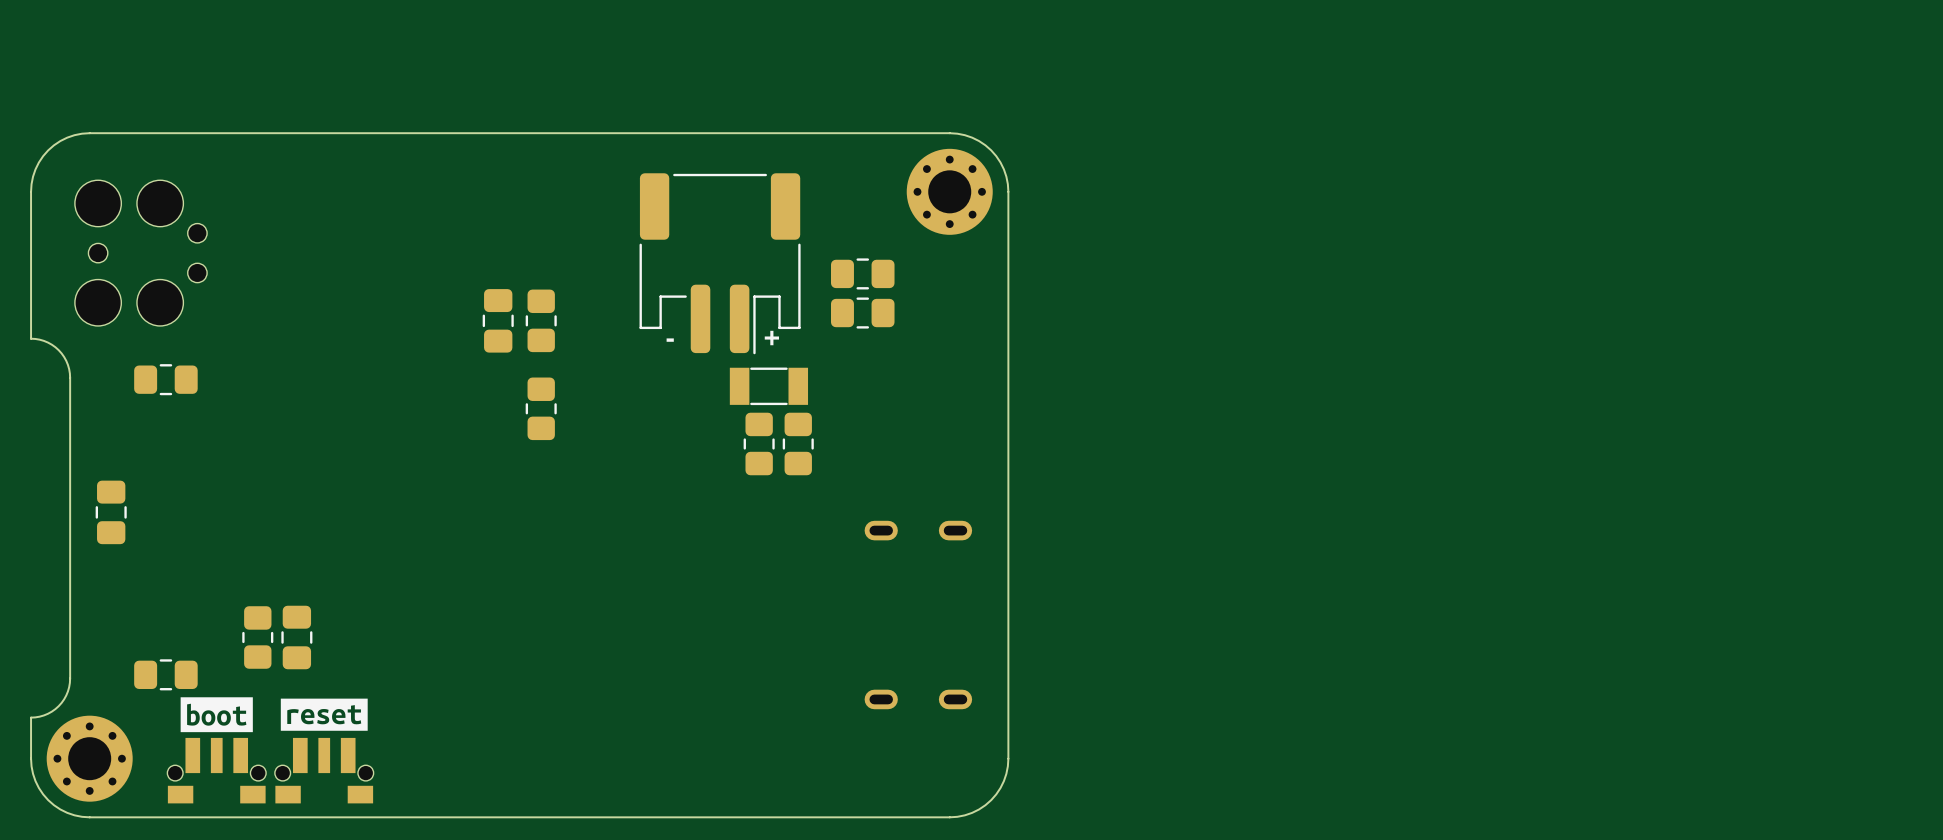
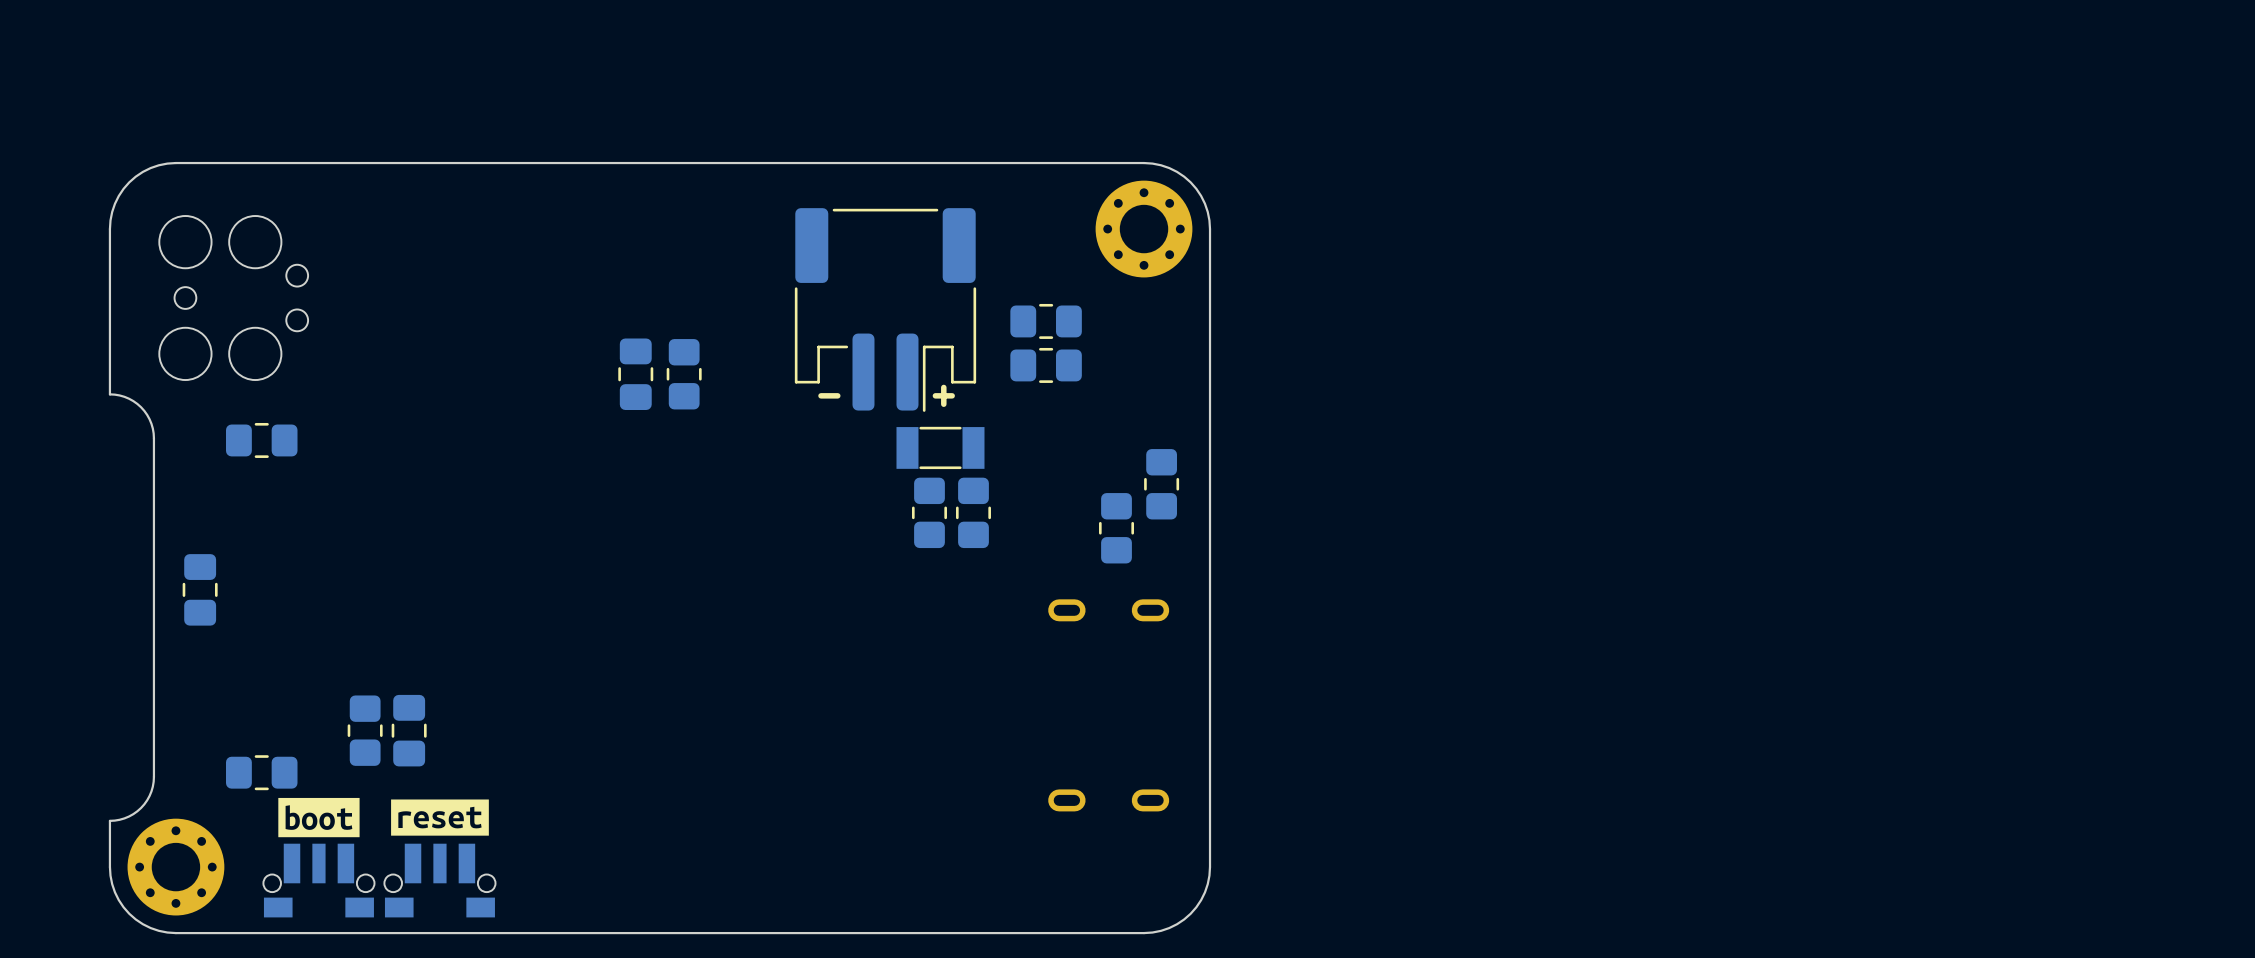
part: (541, 408) -> none
part: none -> (1161, 484)
part: none -> (1116, 528)

